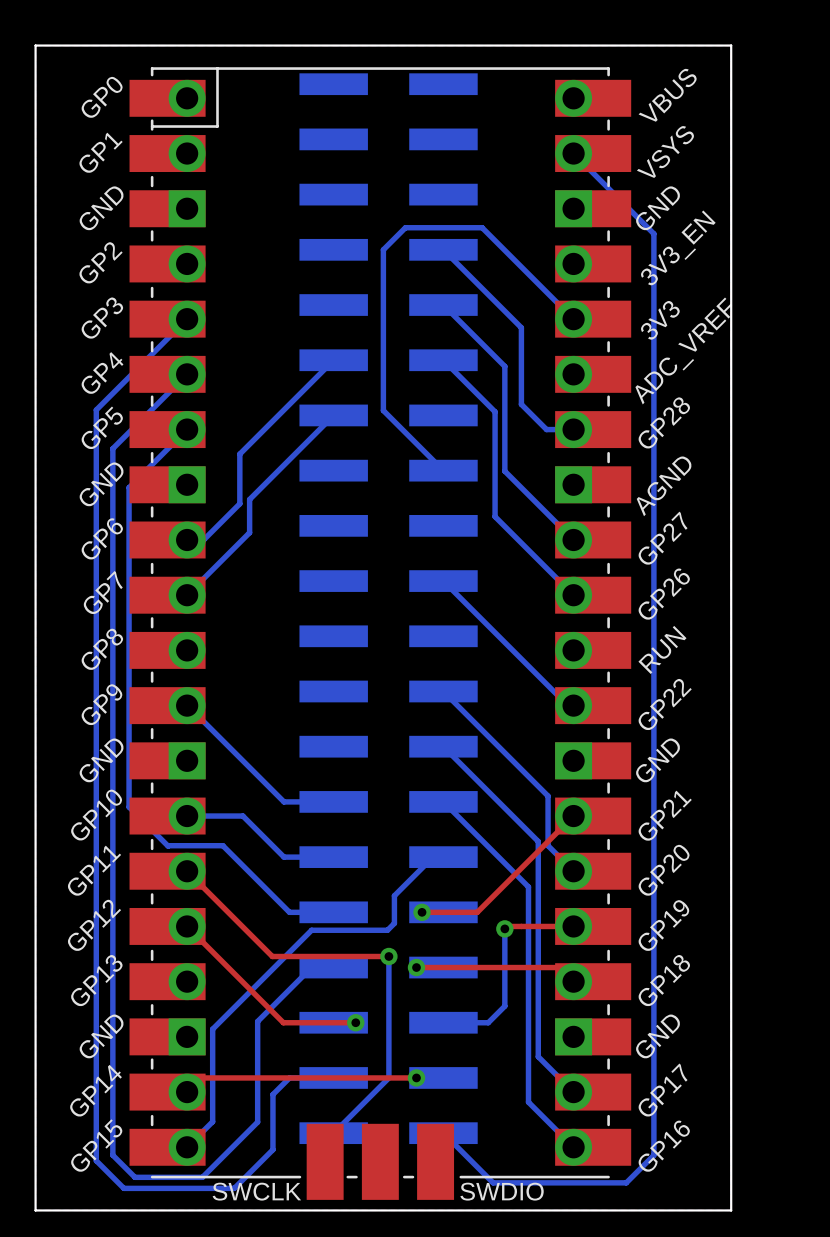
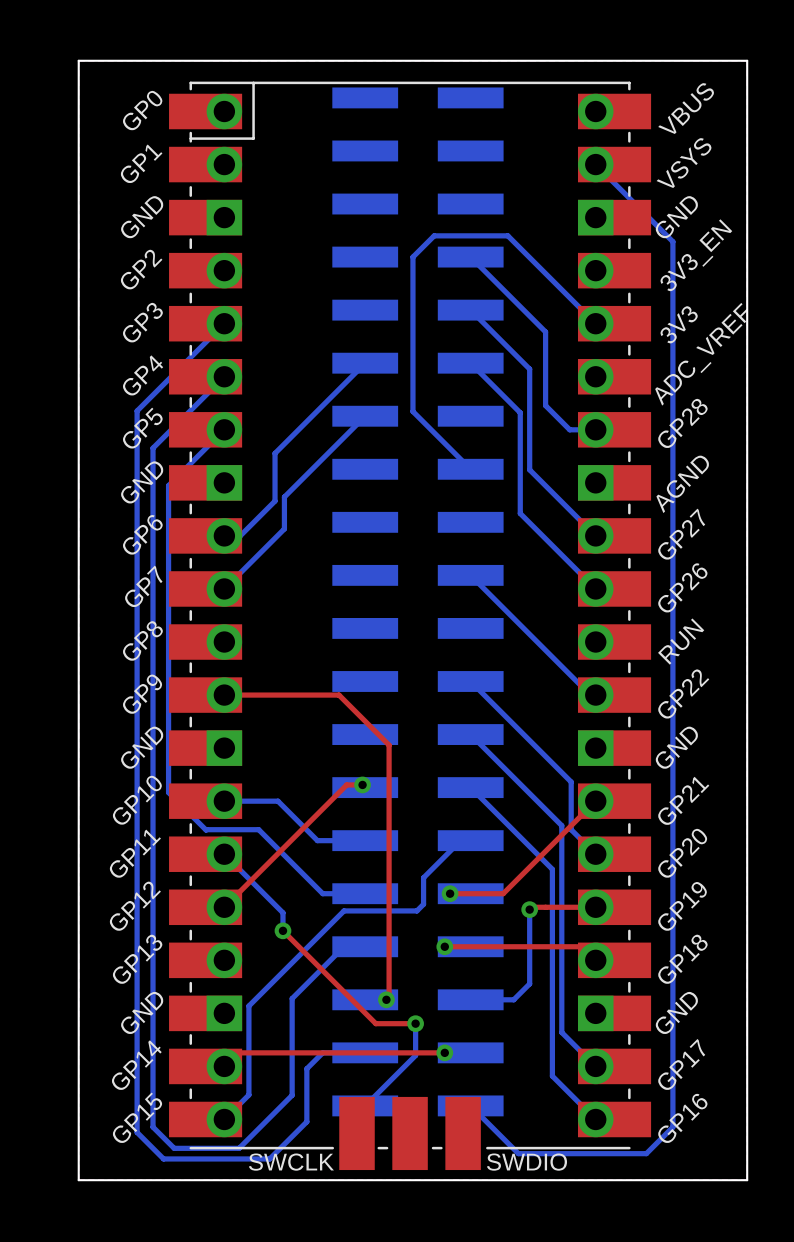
top track: none -> (224, 695) (339, 695) (389, 745) (389, 997)
bottom track: (187, 705) (284, 801) (333, 801) -> none
via: none -> (362, 784)
top track: (187, 871) (272, 956) (388, 956) -> none
bottom track: none -> (224, 854) (282, 912) (282, 930)
top track: (187, 926) (283, 1022) (355, 1022) -> (224, 907) (346, 784) (362, 784)
top track: none -> (282, 930) (375, 1023) (415, 1023)
via: none -> (282, 930)
bottom track: (388, 956) (388, 1077) (386, 1080) -> (415, 1023) (415, 1055)
via: (388, 956) -> none
via: none -> (415, 1023)

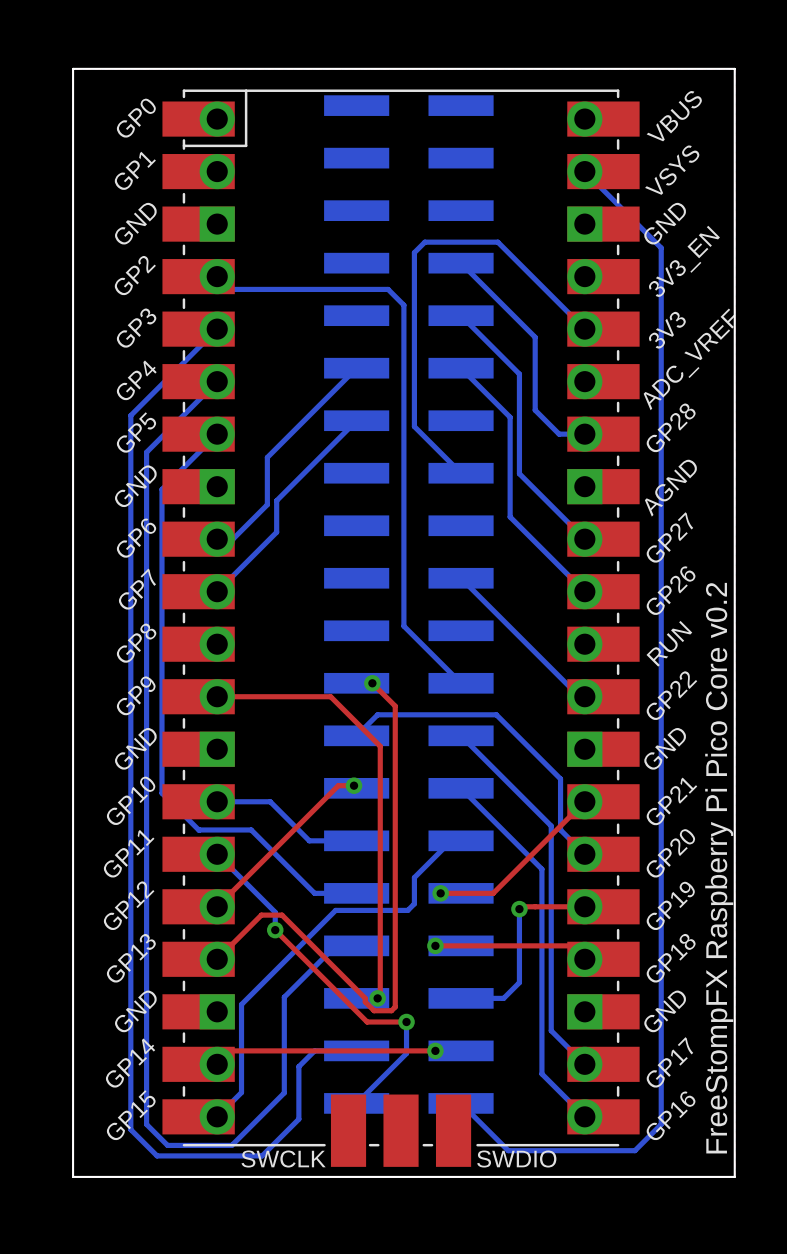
bottom track: (423, 246) (412, 257) (412, 299) -> (414, 252) (414, 426)
bottom track: none -> (217, 276) (230, 289) (388, 289) (403, 305)
bottom track: (412, 411) (423, 422) -> (403, 416) (403, 626) (461, 683)
top track: none -> (372, 683) (395, 706) (395, 1007) (391, 1010) (374, 1010) (365, 1001) (365, 998) (282, 915) (261, 915) (217, 959)
via: none -> (372, 683)
bottom track: (470, 681) (571, 782) -> (356, 735) (377, 714) (496, 714) (560, 778) (560, 782)
text: none -> FreeStompFX Raspberry Pi Pico Core v0.2 (719, 868)

